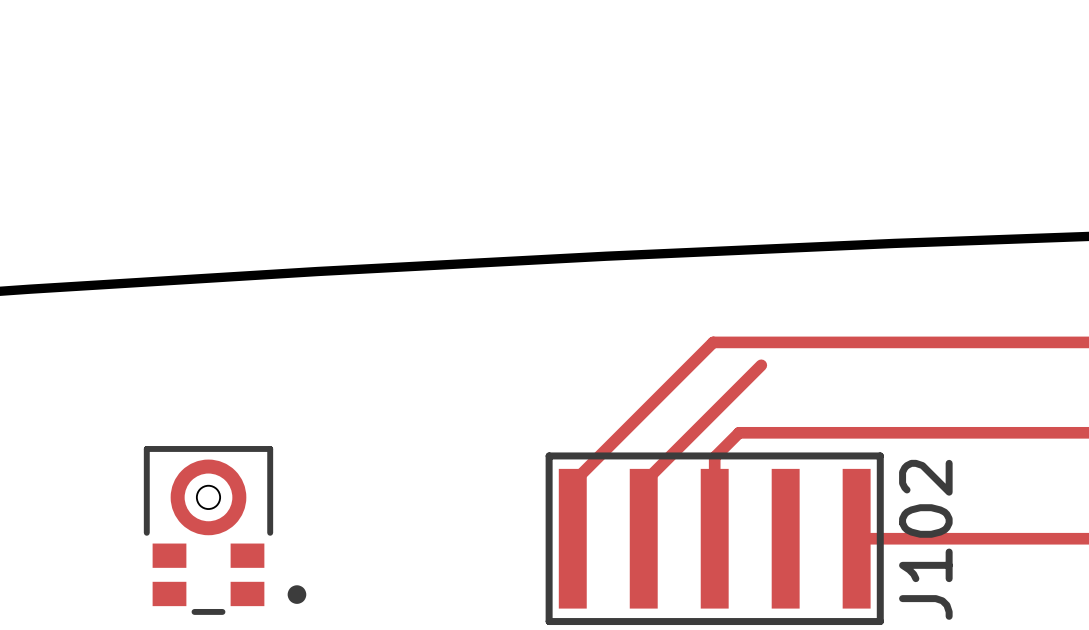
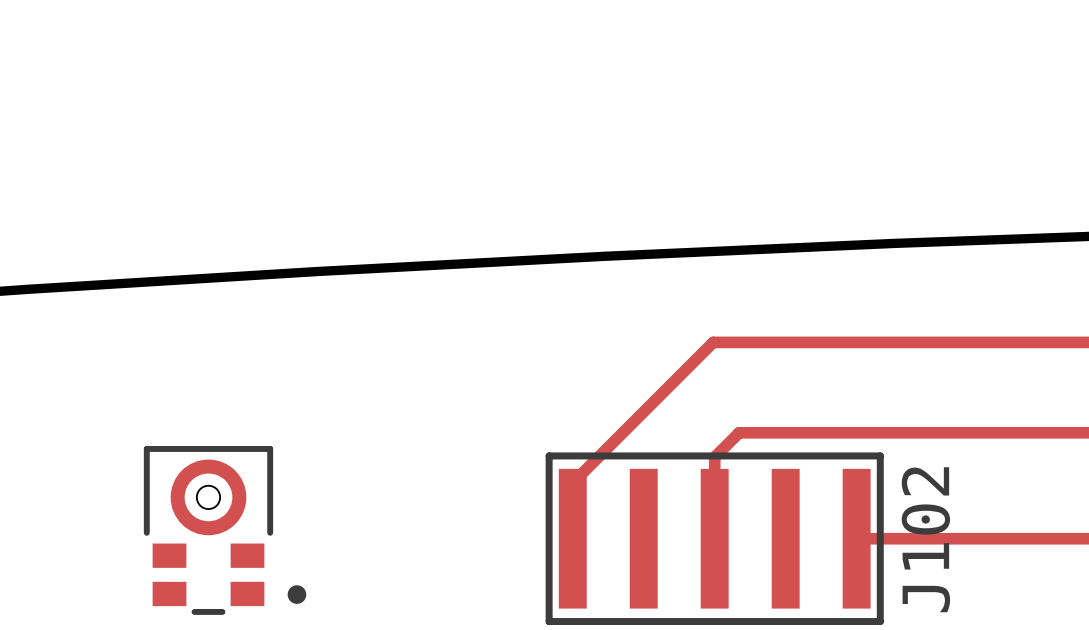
top track: (761, 365) (643, 482) (643, 538) -> none

